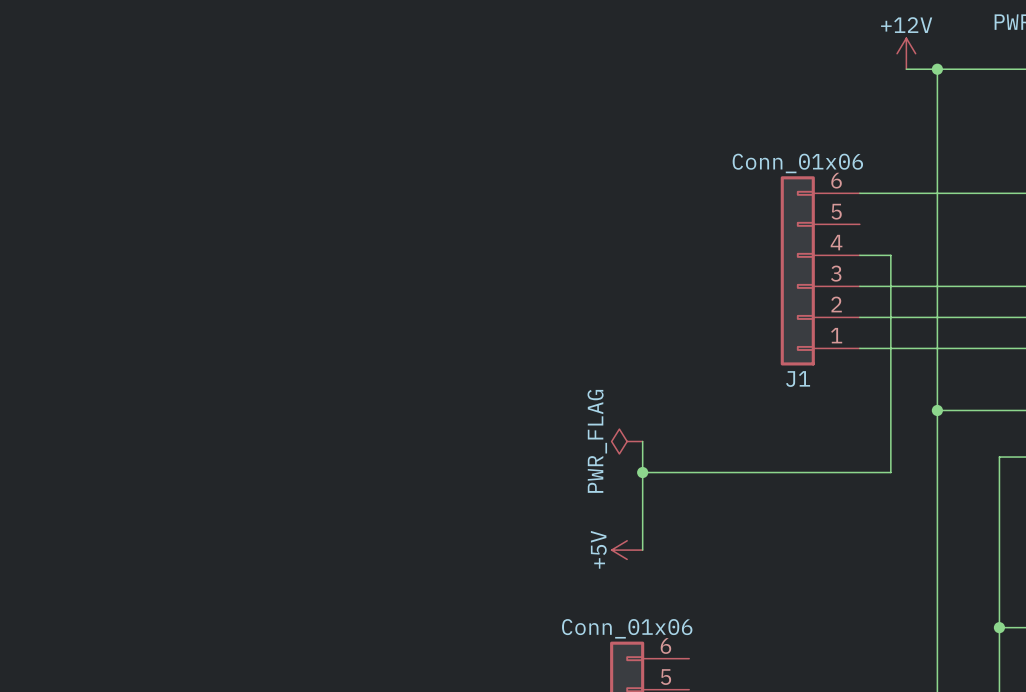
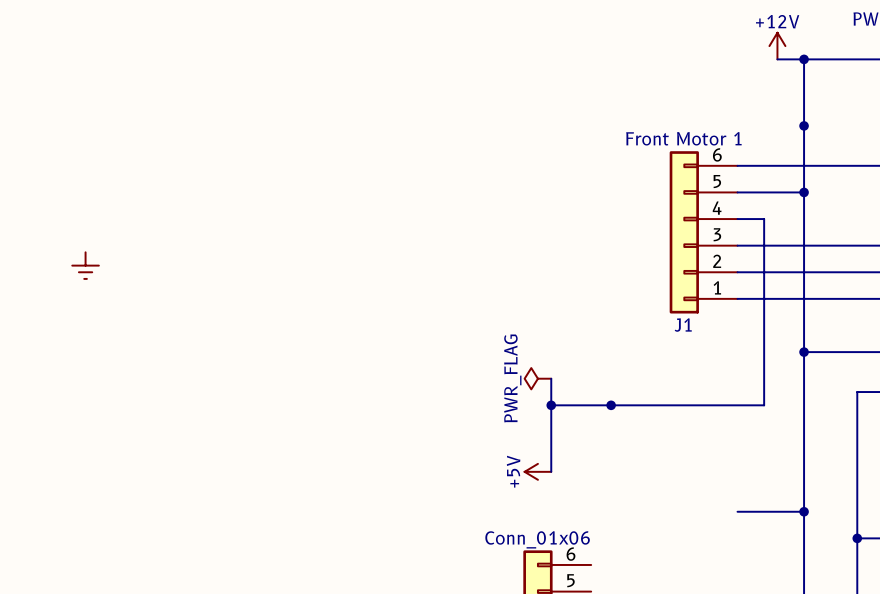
junction: none -> (804, 125)
J1 value: Conn_01x06 (797, 163) -> Front Motor 1 (683, 138)
wire: none -> (737, 192) (804, 192)
junction: none -> (804, 192)
power symbol: none -> (85, 265)
junction: none -> (611, 405)
wire: none -> (737, 511) (804, 511)
junction: none -> (804, 511)

